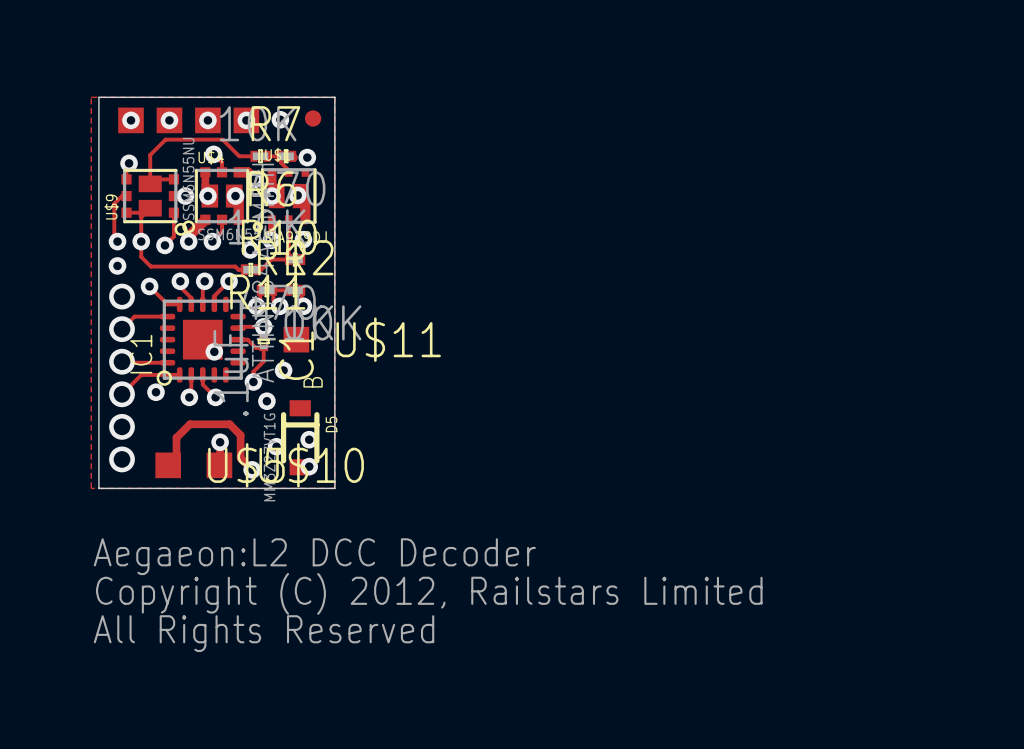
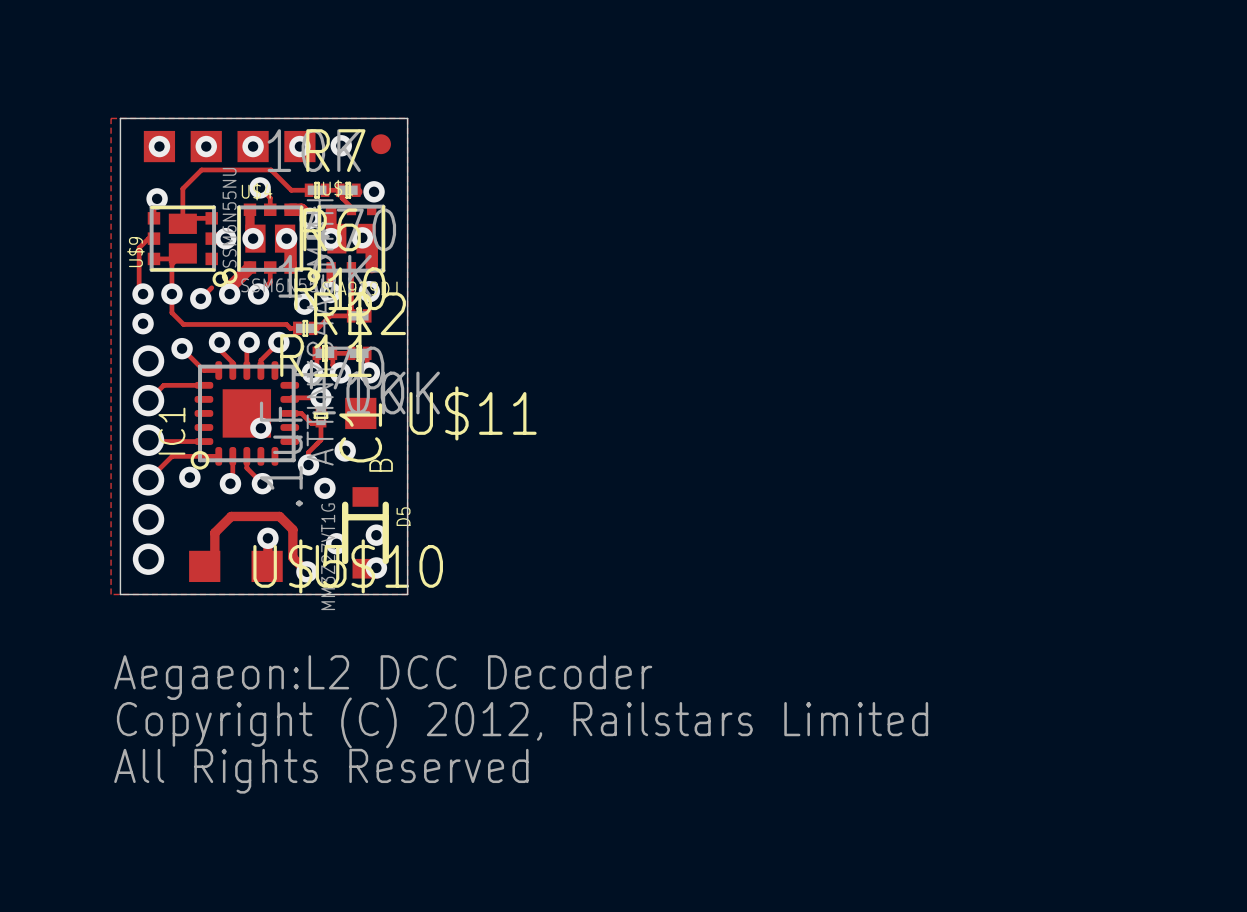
track: (173, 212) (173, 236) -> none

